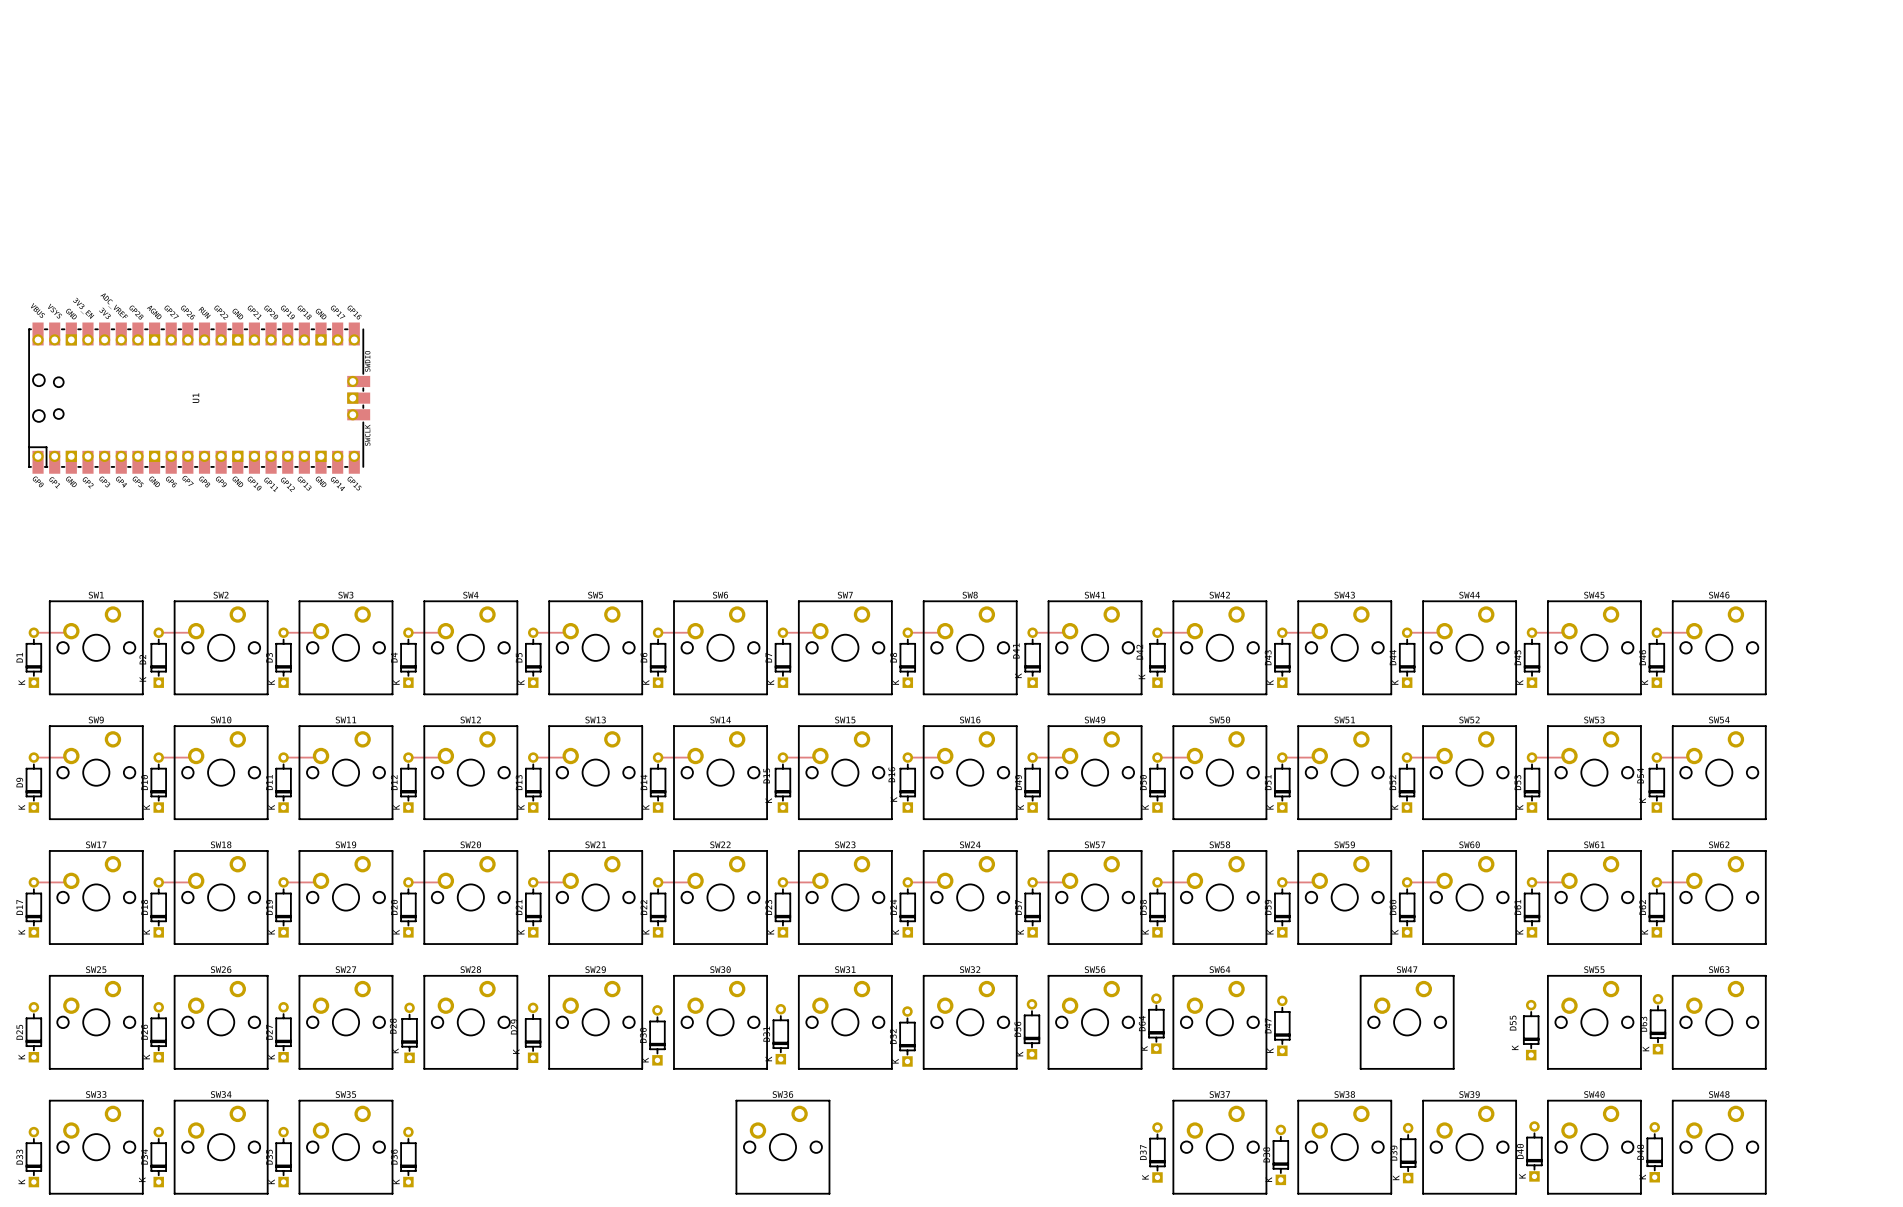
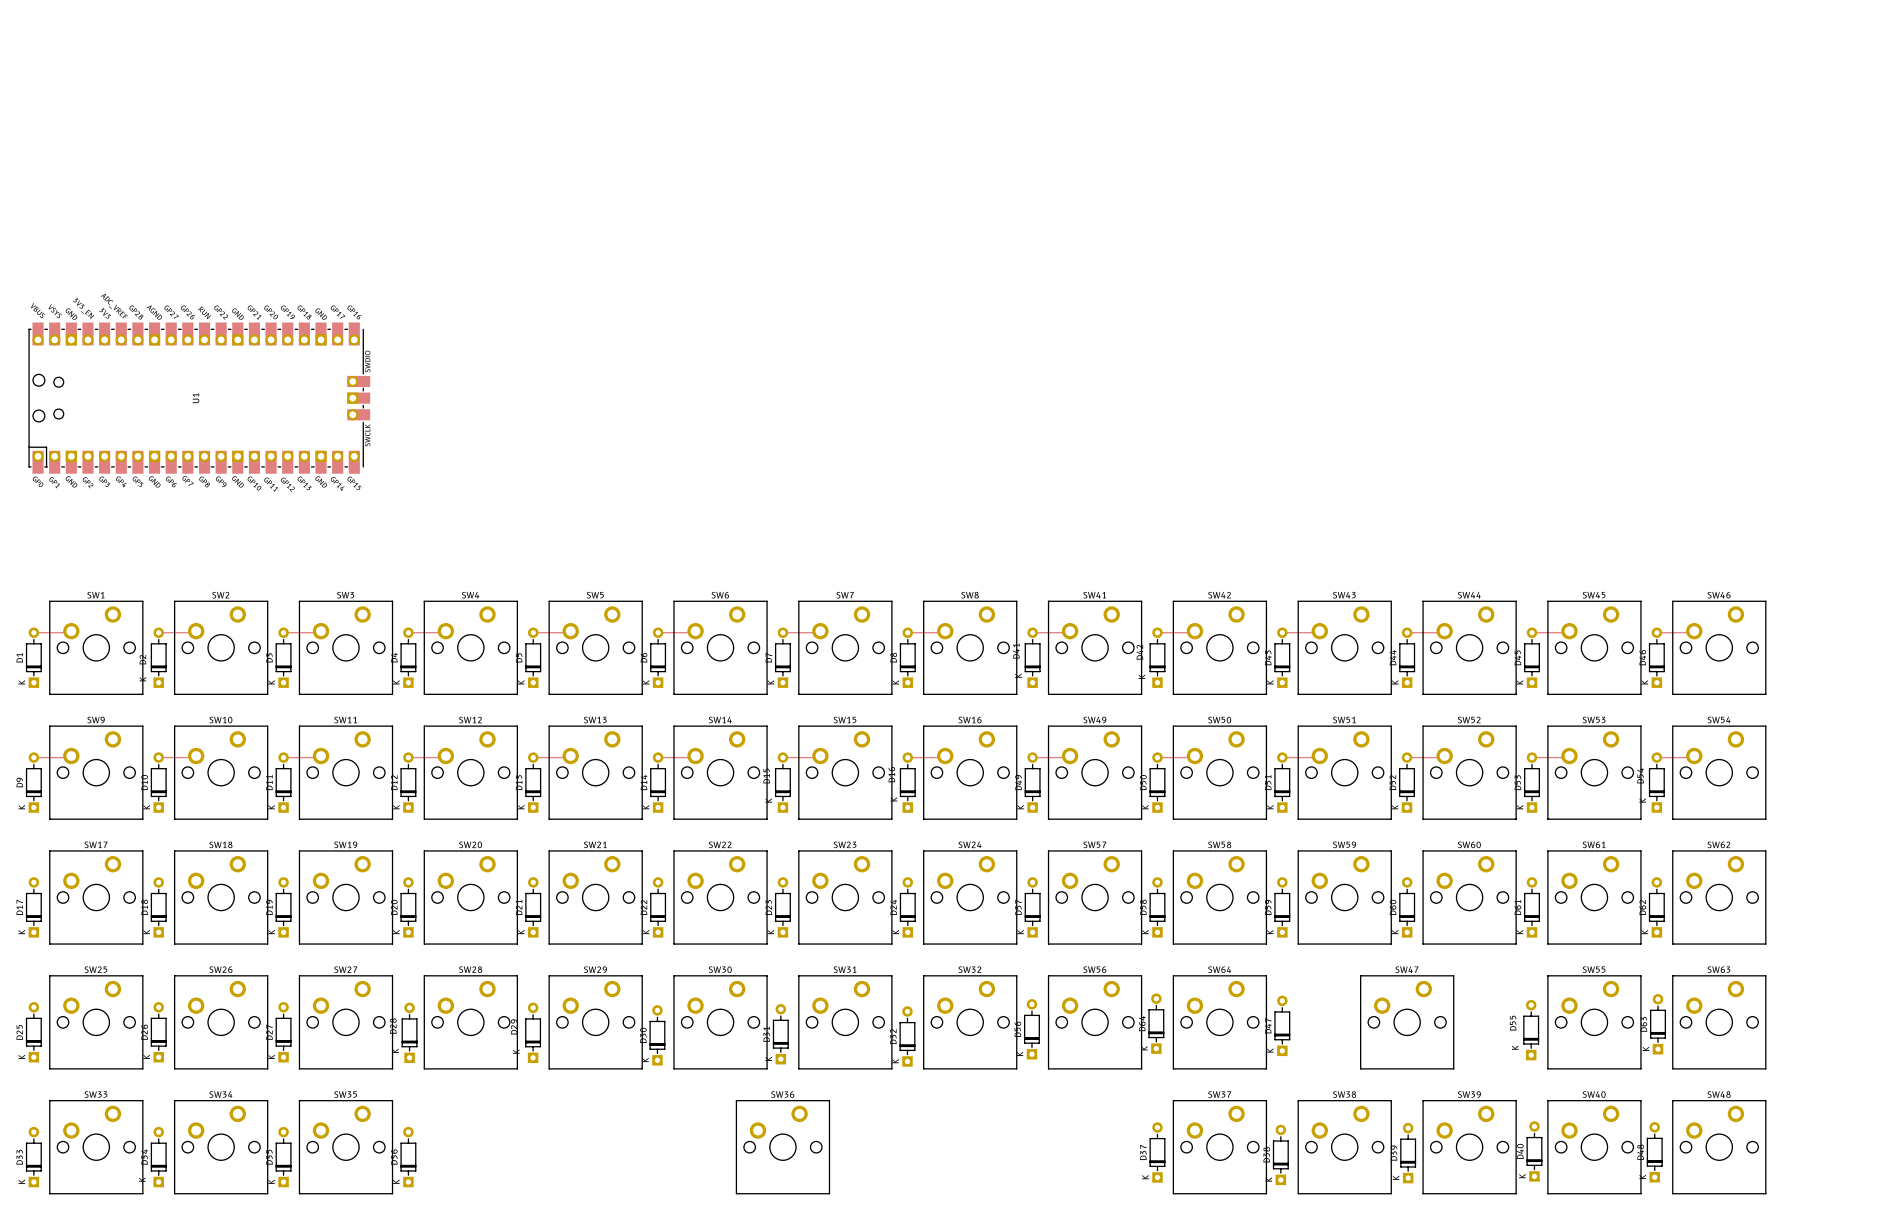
top track: (71, 880) (69, 882) (33, 882) -> none
top track: (196, 880) (194, 882) (158, 882) -> none
top track: (321, 880) (319, 882) (283, 882) -> none
top track: (445, 880) (444, 882) (408, 882) -> none
top track: (570, 880) (569, 882) (533, 882) -> none
top track: (695, 880) (693, 882) (658, 882) -> none
top track: (820, 880) (818, 882) (782, 882) -> none
top track: (945, 880) (943, 882) (907, 882) -> none
top track: (1070, 880) (1068, 882) (1032, 882) -> none
top track: (1194, 880) (1193, 882) (1157, 882) -> none
top track: (1319, 880) (1318, 882) (1282, 882) -> none
top track: (1444, 880) (1443, 882) (1407, 882) -> none
top track: (1569, 880) (1567, 882) (1532, 882) -> none
top track: (1694, 880) (1692, 882) (1656, 882) -> none

